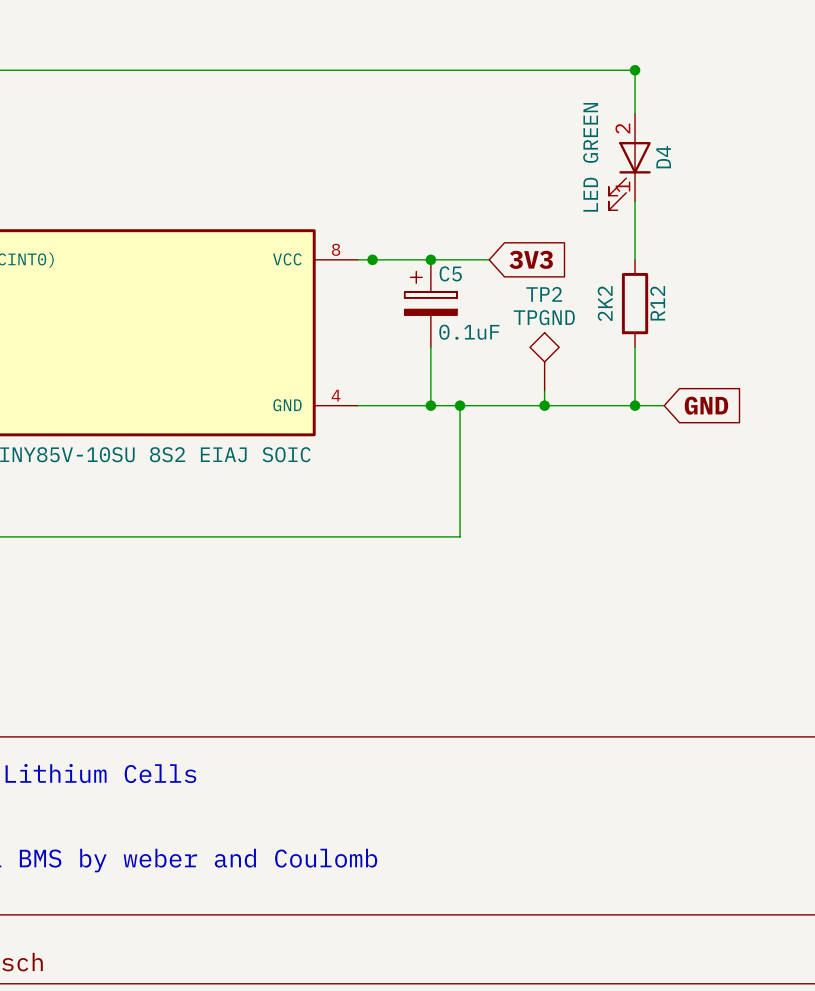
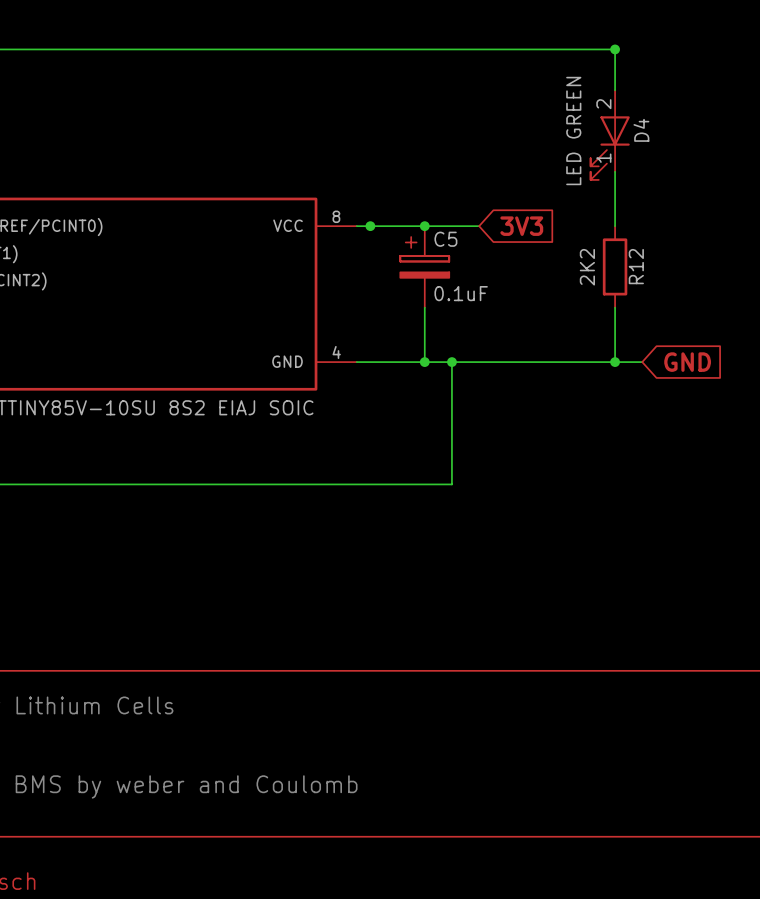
TP2: TPGND (544, 361) -> none
wire: (544, 391) (544, 405) -> none
junction: (544, 405) -> none

